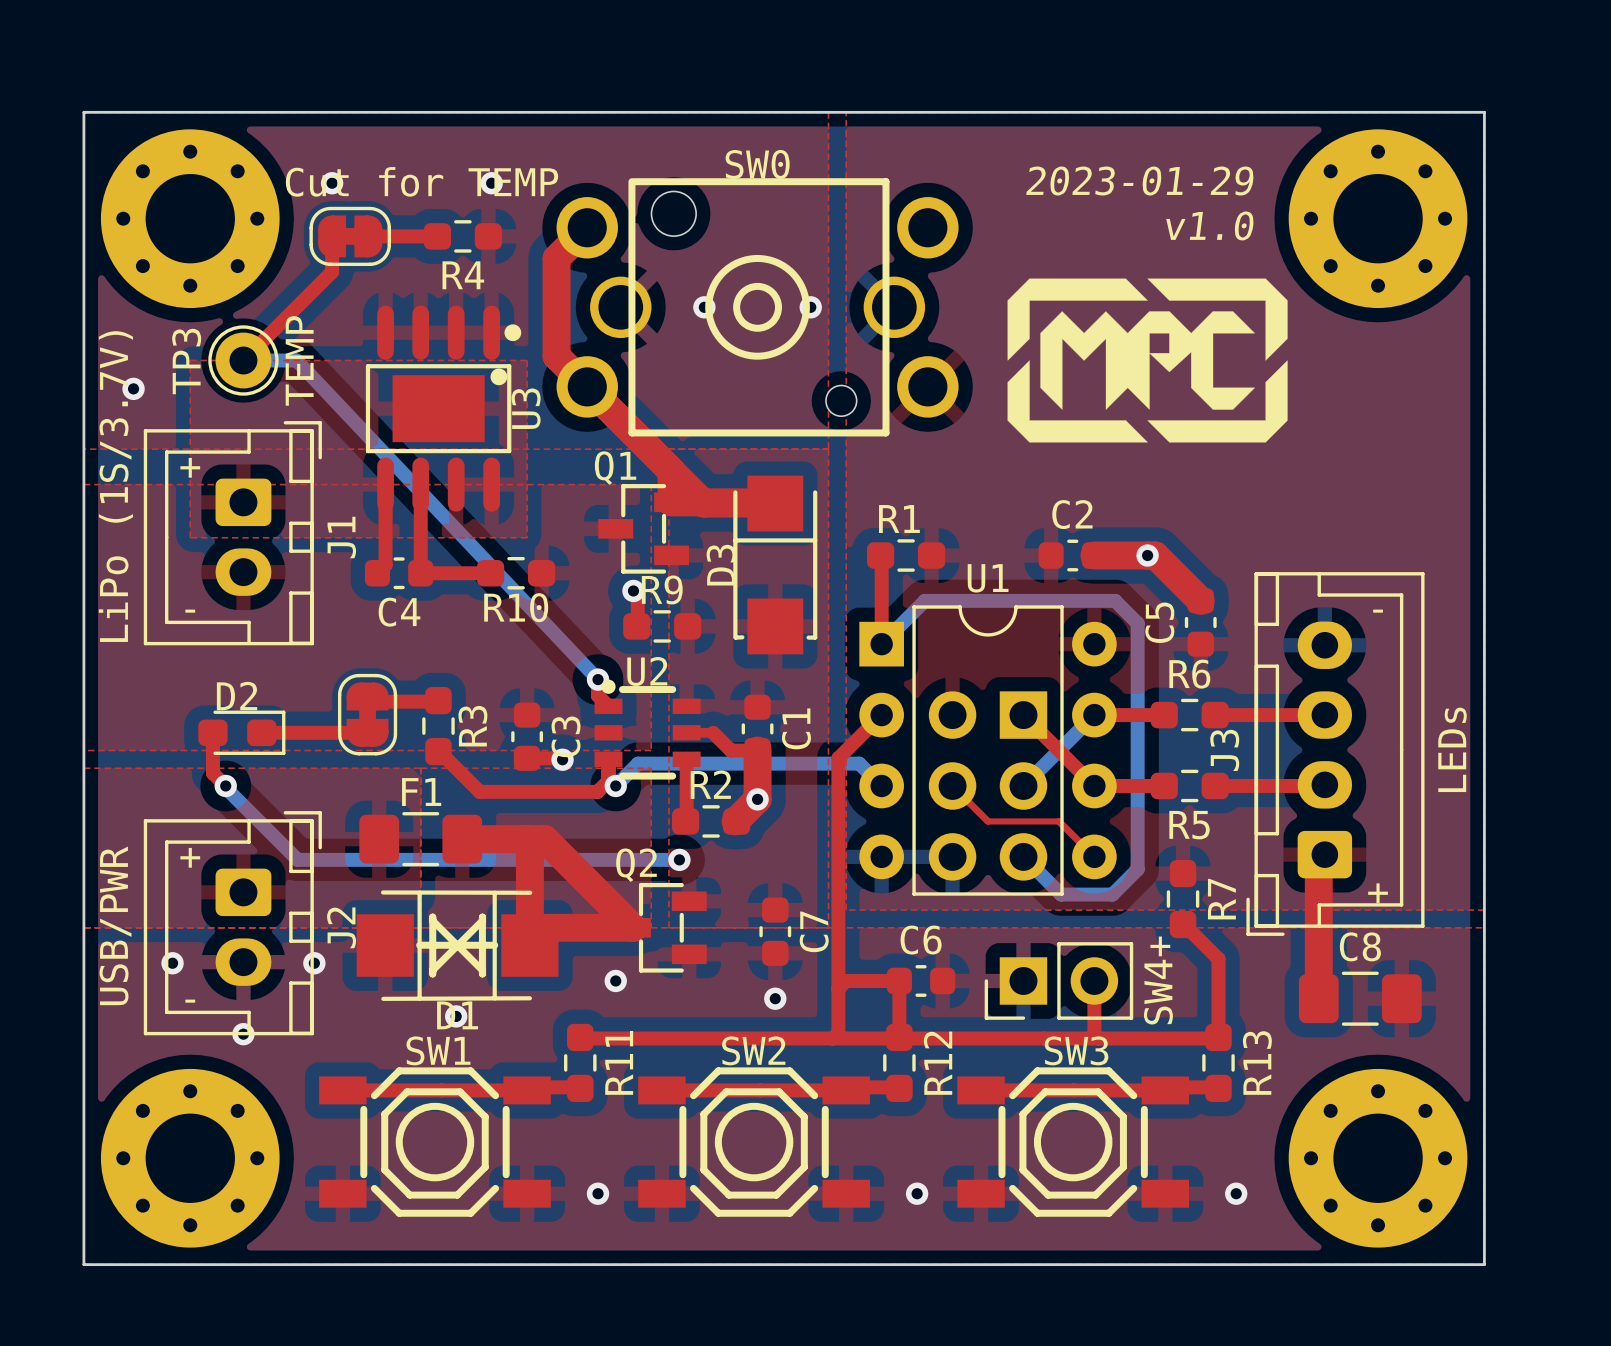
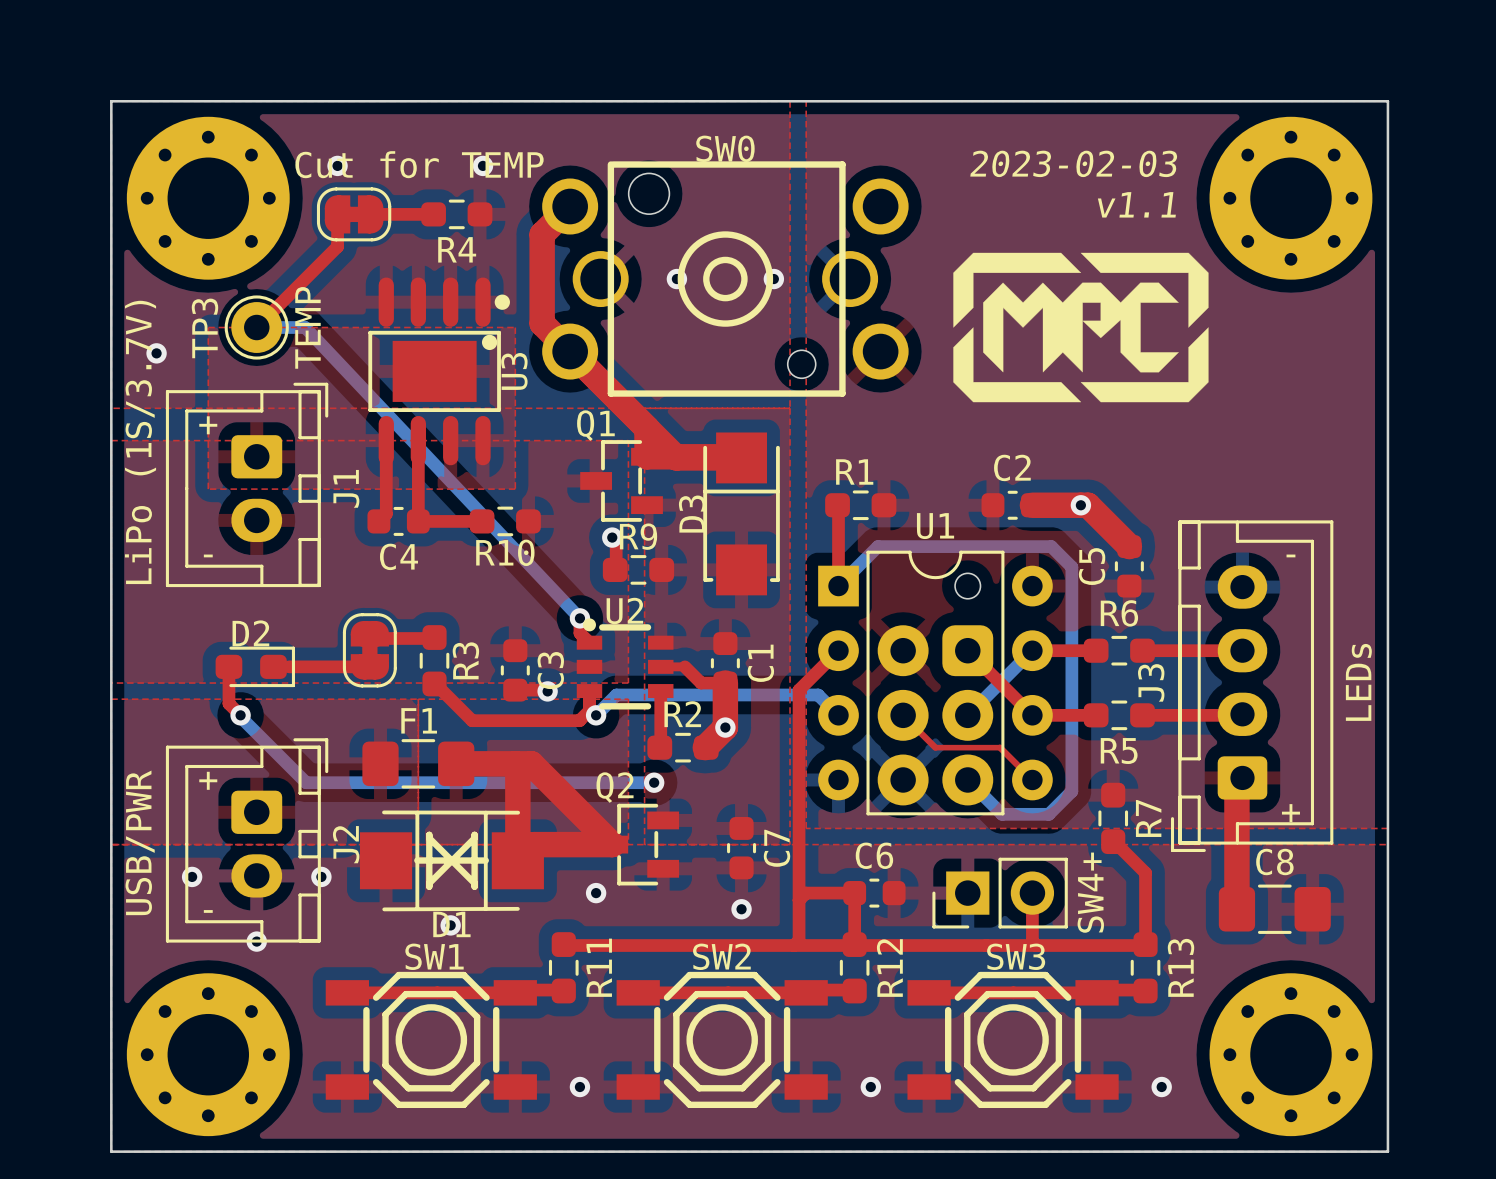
text: 2023-01-29 (1140, 181) -> 2023-02-03 (1073, 163)
text: v1.0 (1210, 225) -> v1.1 (1136, 204)
part: none -> (935, 689)
part: (988, 785) -> none

